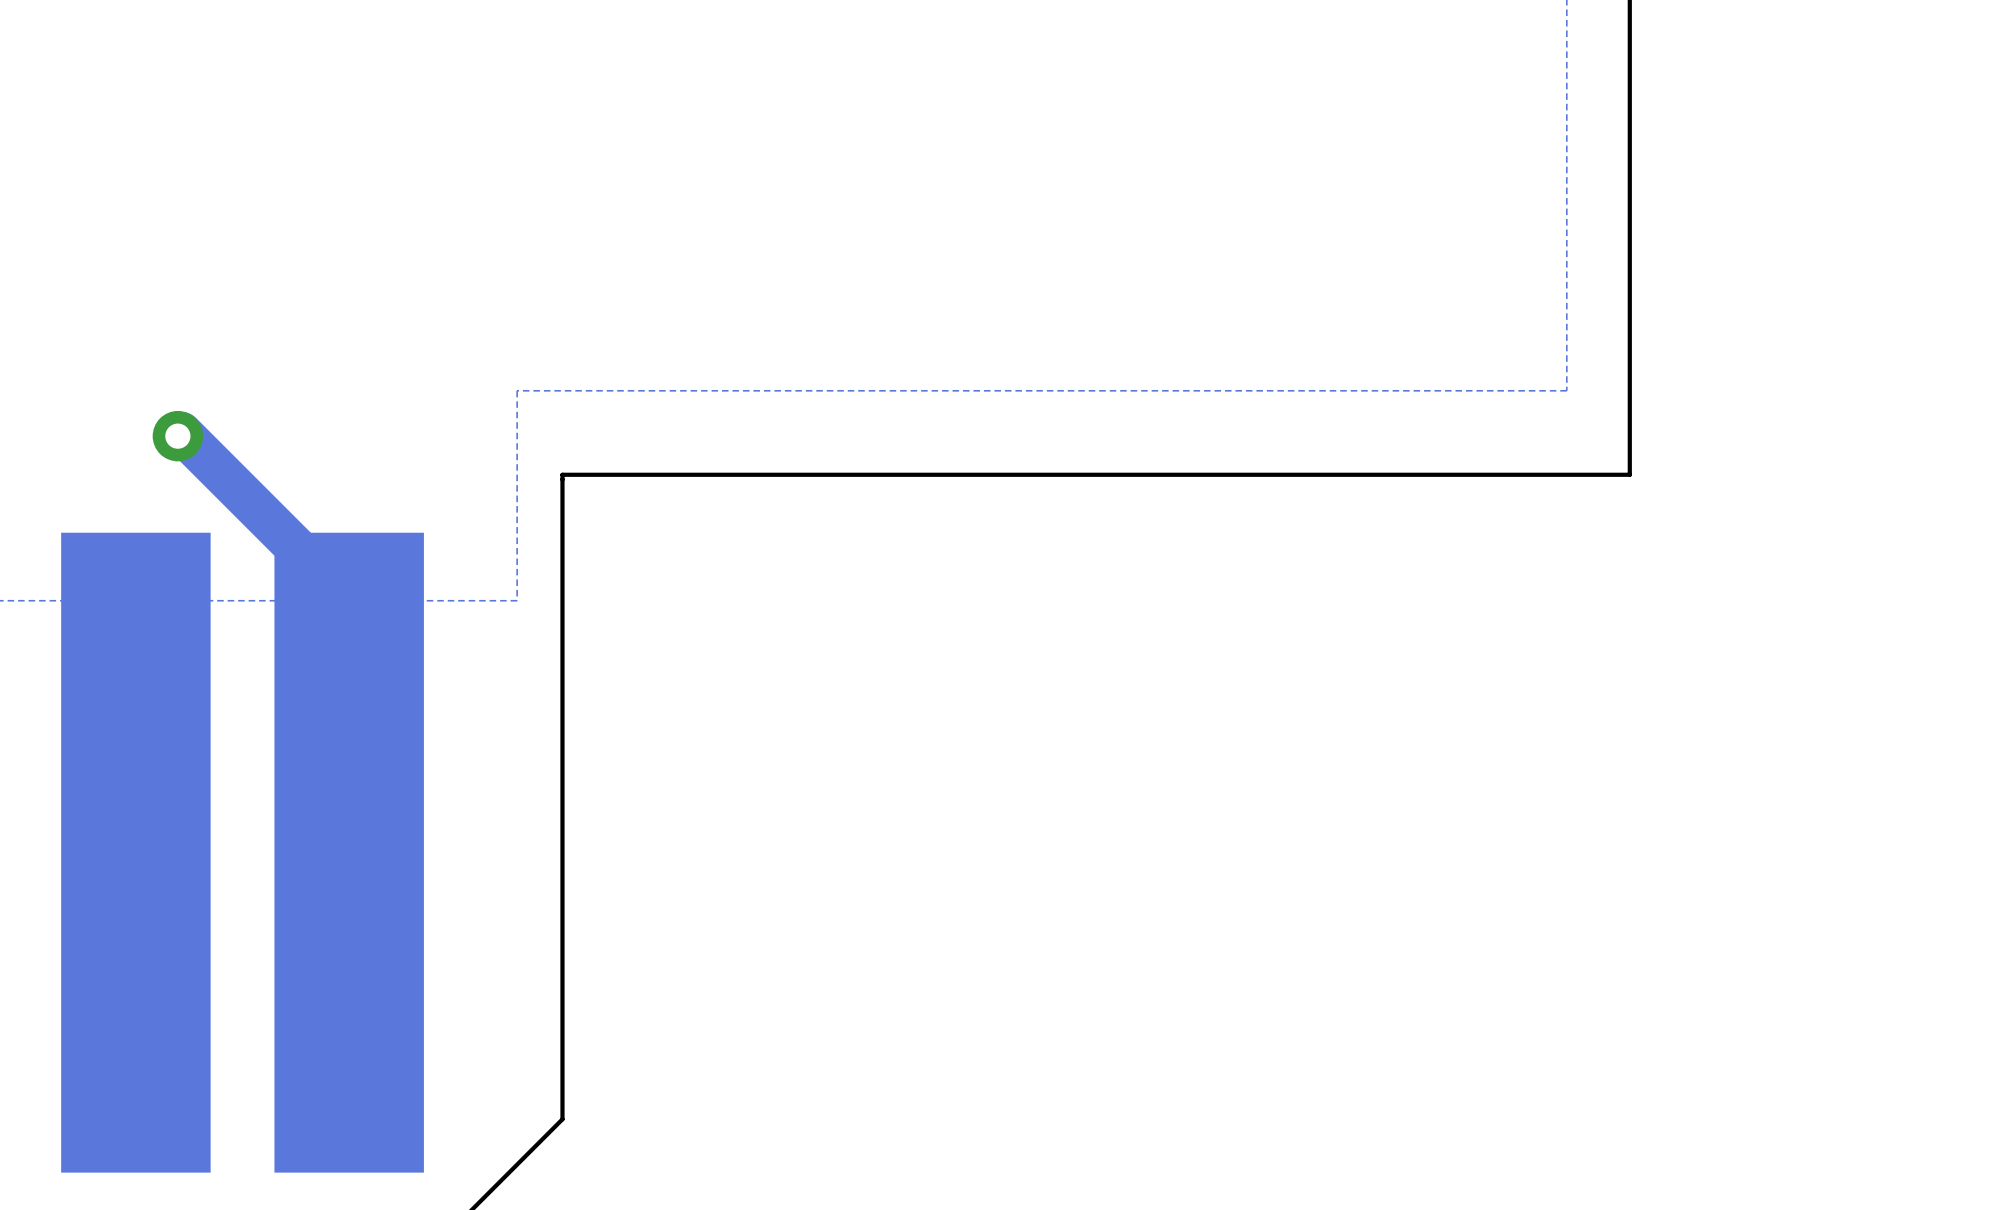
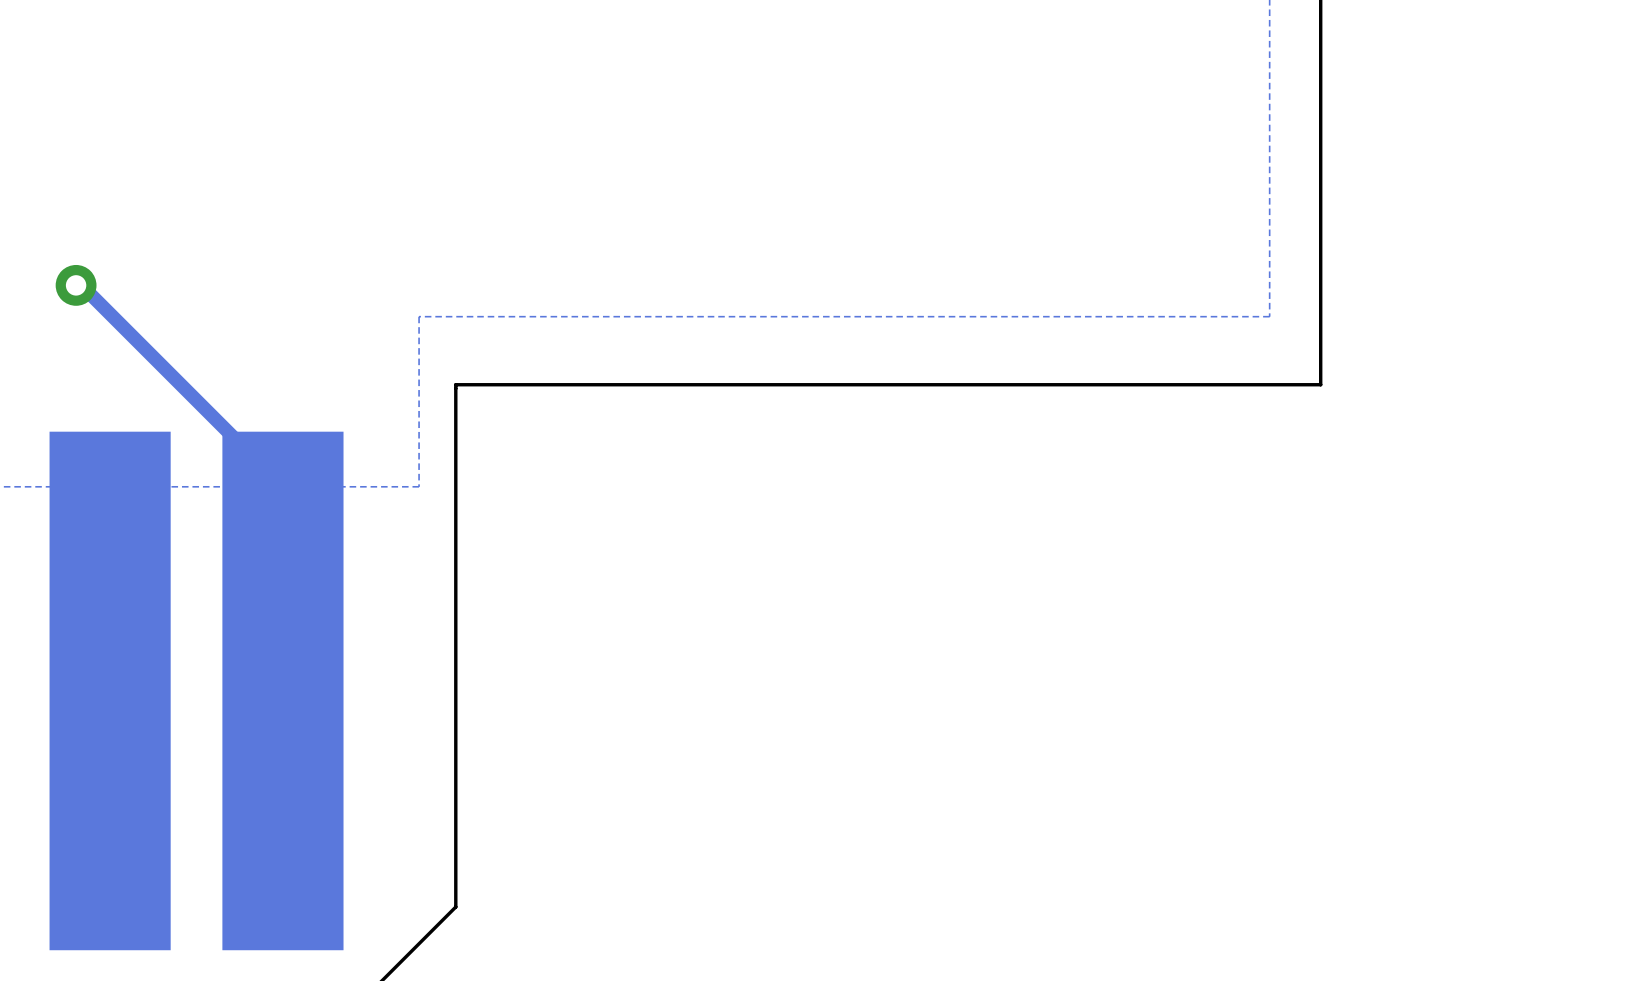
track: none -> (78, 282) (146, 350)
track width: thick (181, 432) (349, 600) -> thin (146, 350) (282, 486)
via position: (177, 436) -> (76, 285)

